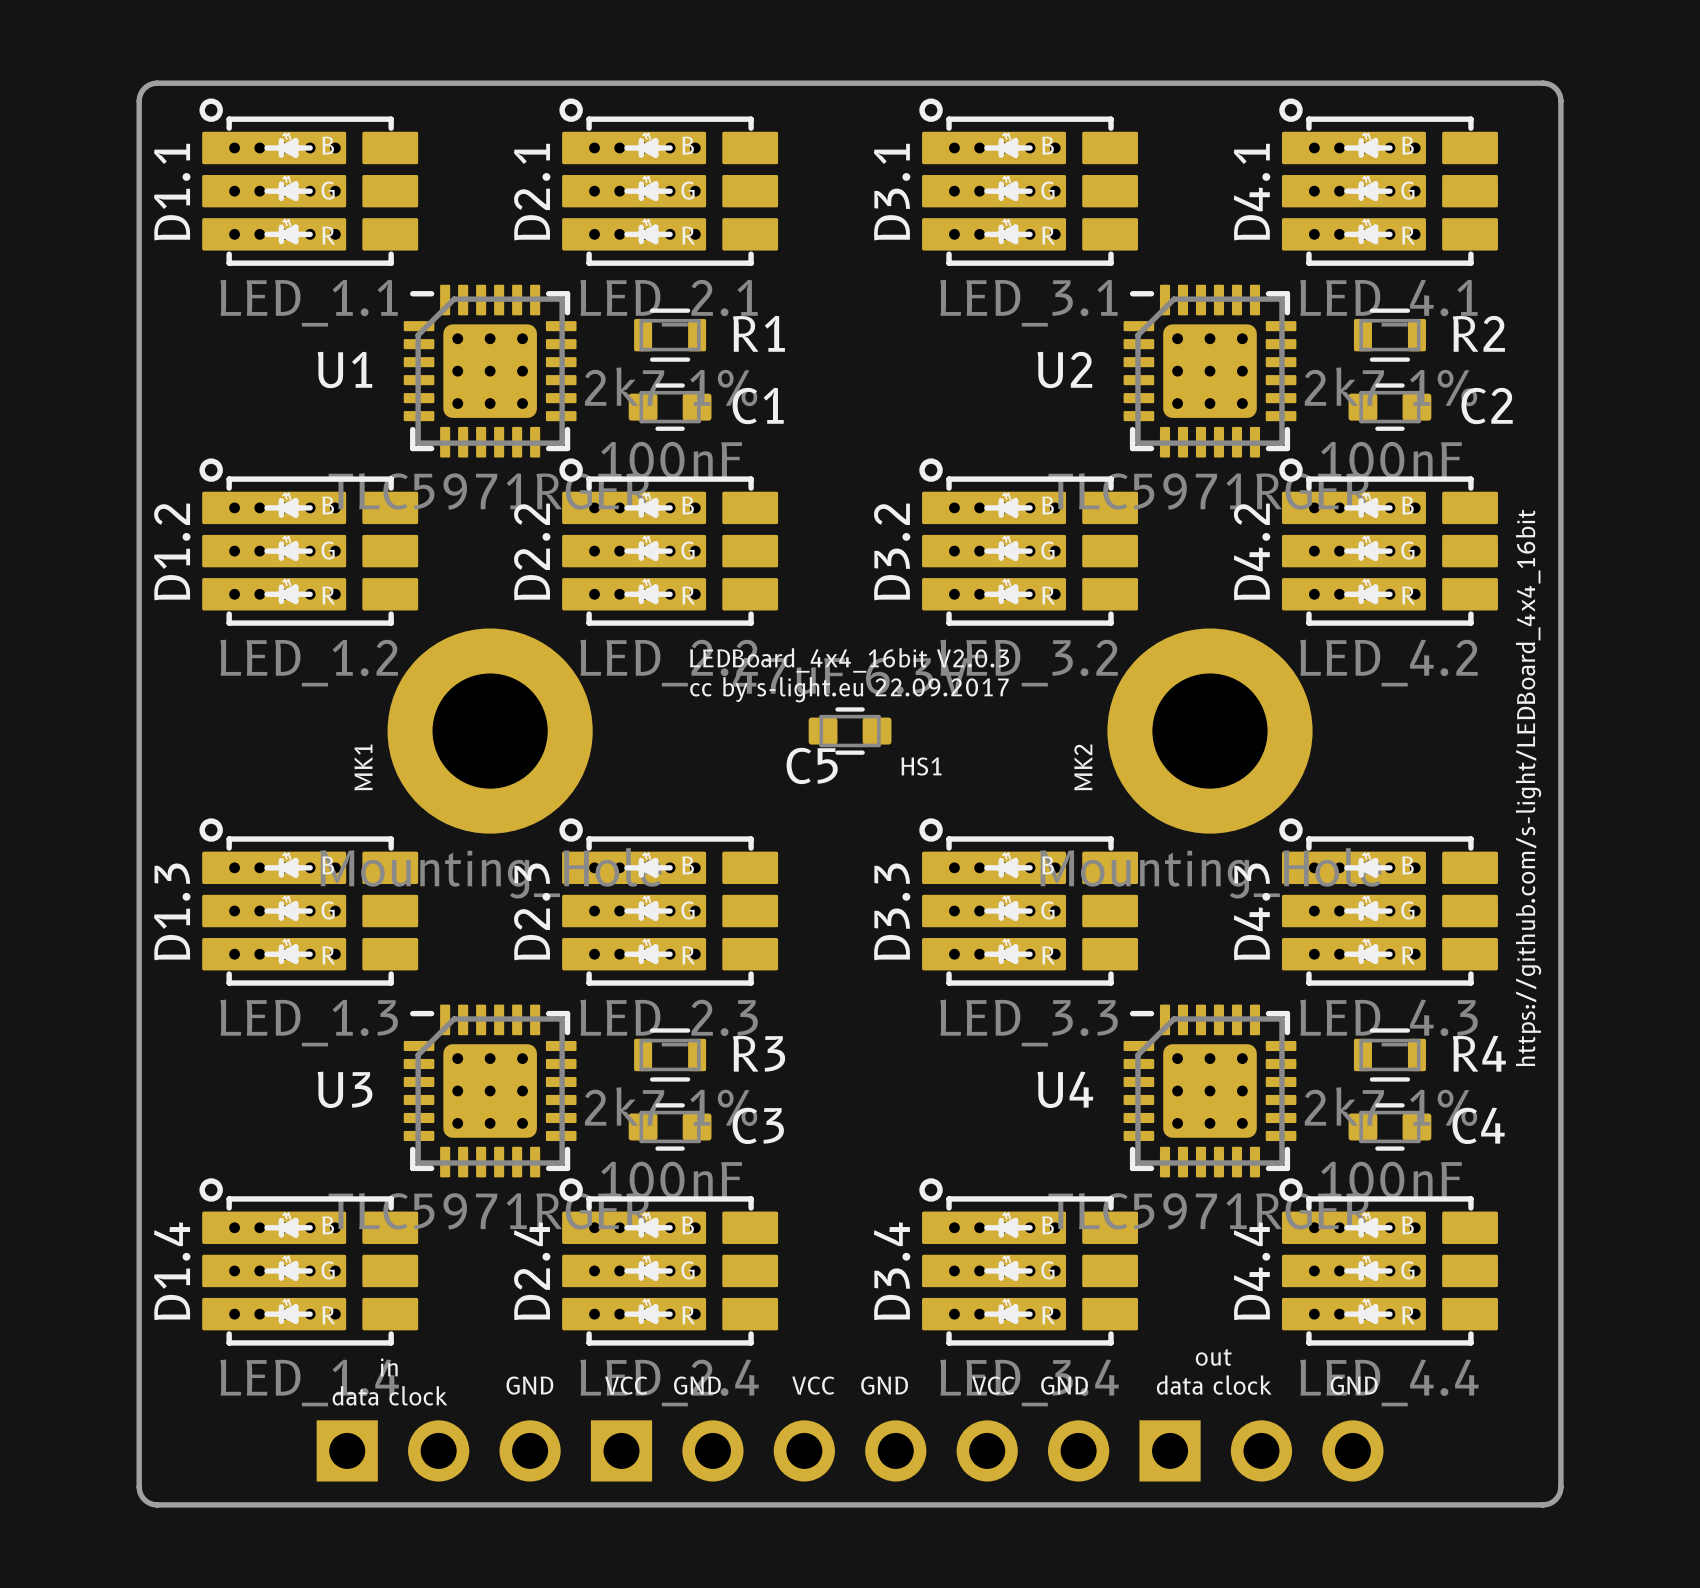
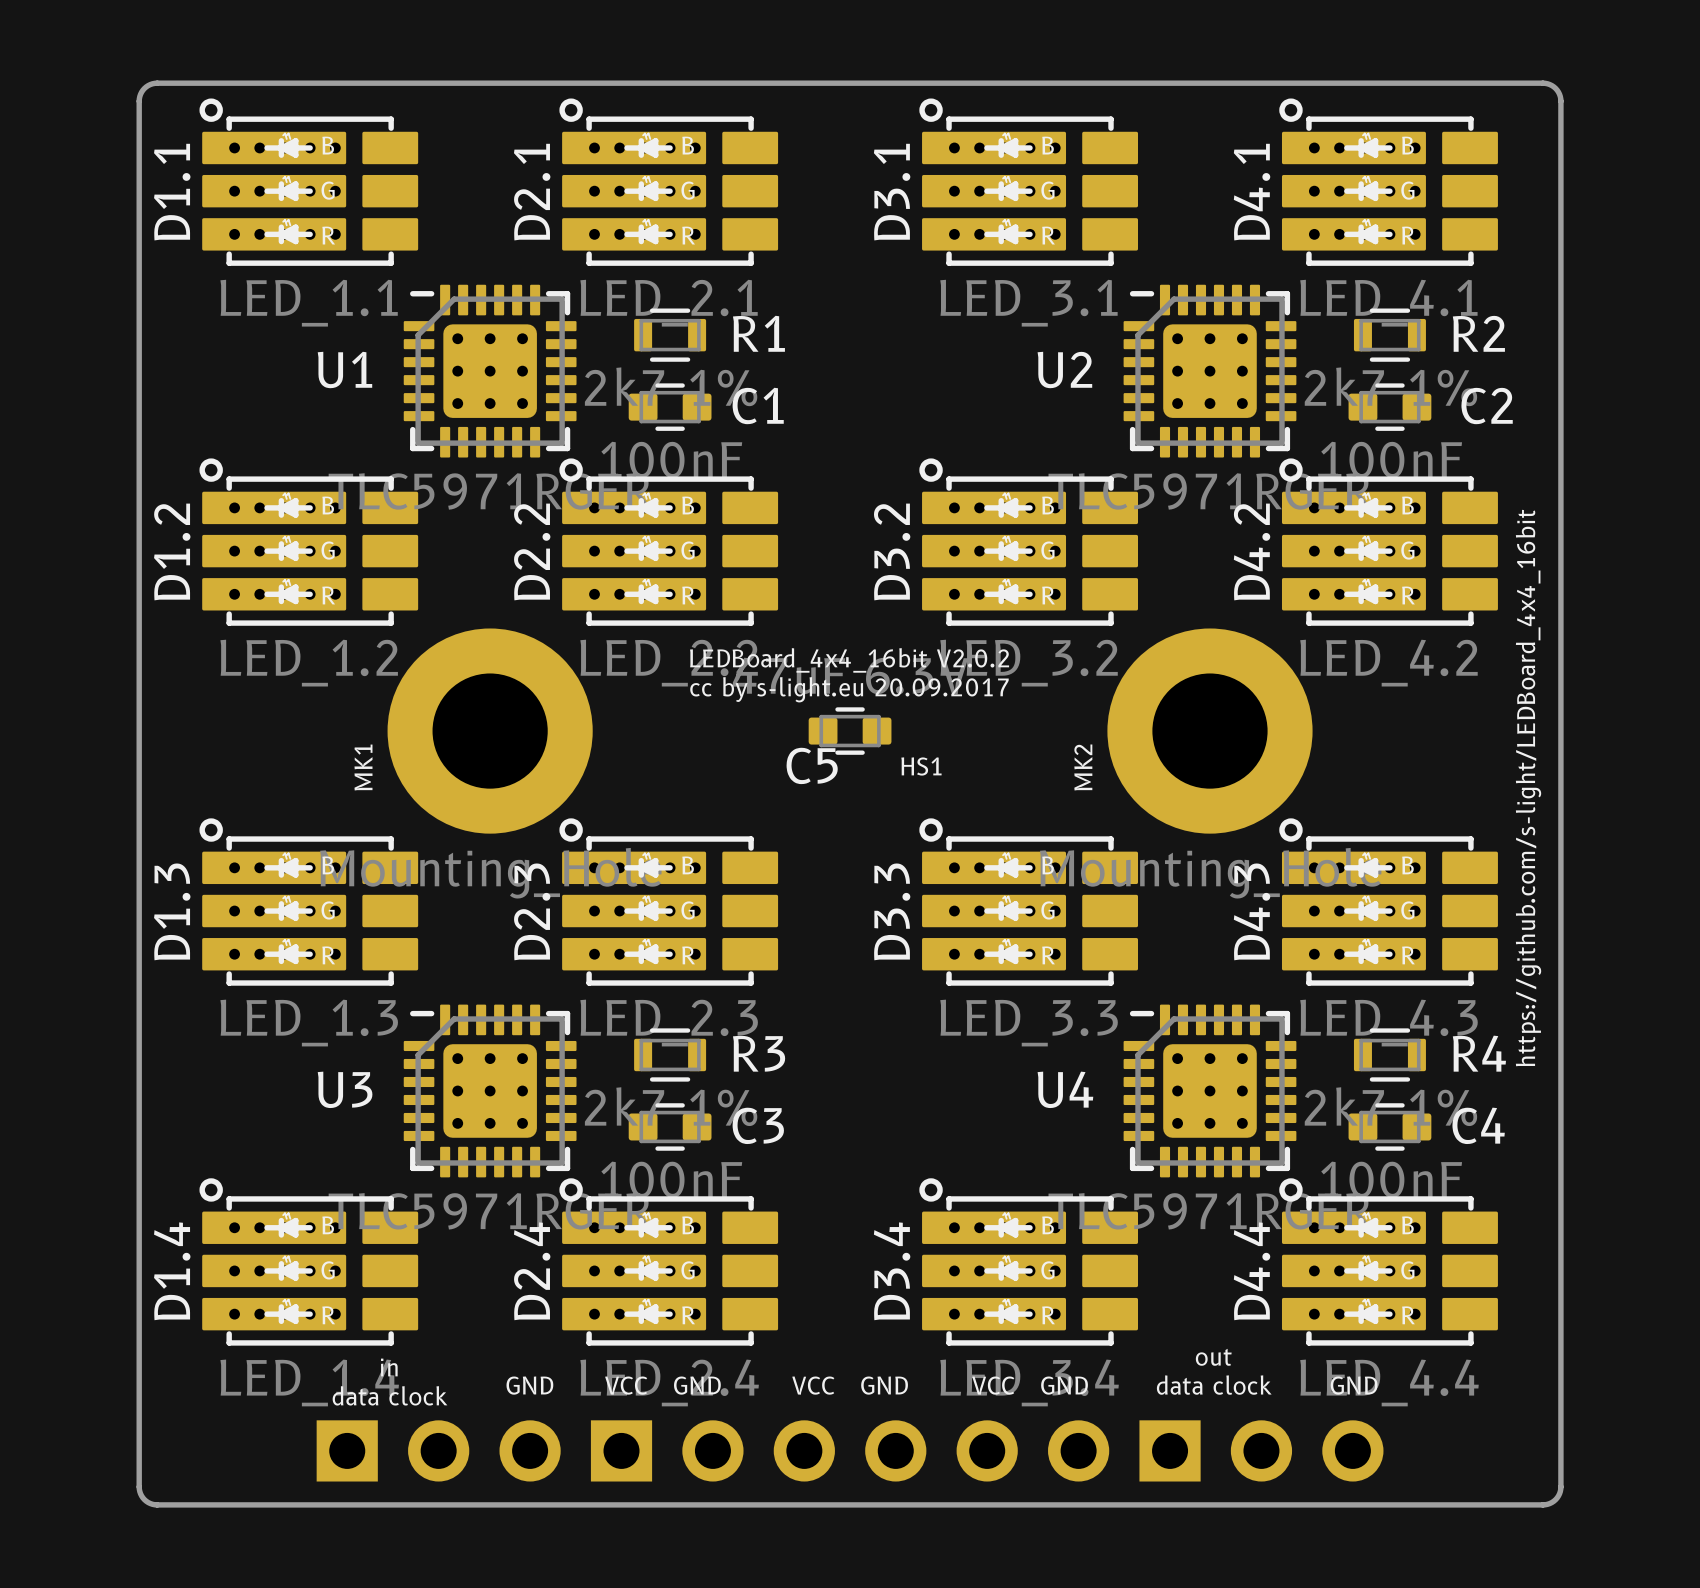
text: LEDBoard_4x4_16bit V2.0.3 (849, 660) -> LEDBoard_4x4_16bit V2.0.2 (849, 660)
text: cc by s-light.eu 22.09.2017 (849, 689) -> cc by s-light.eu 20.09.2017 (849, 689)

